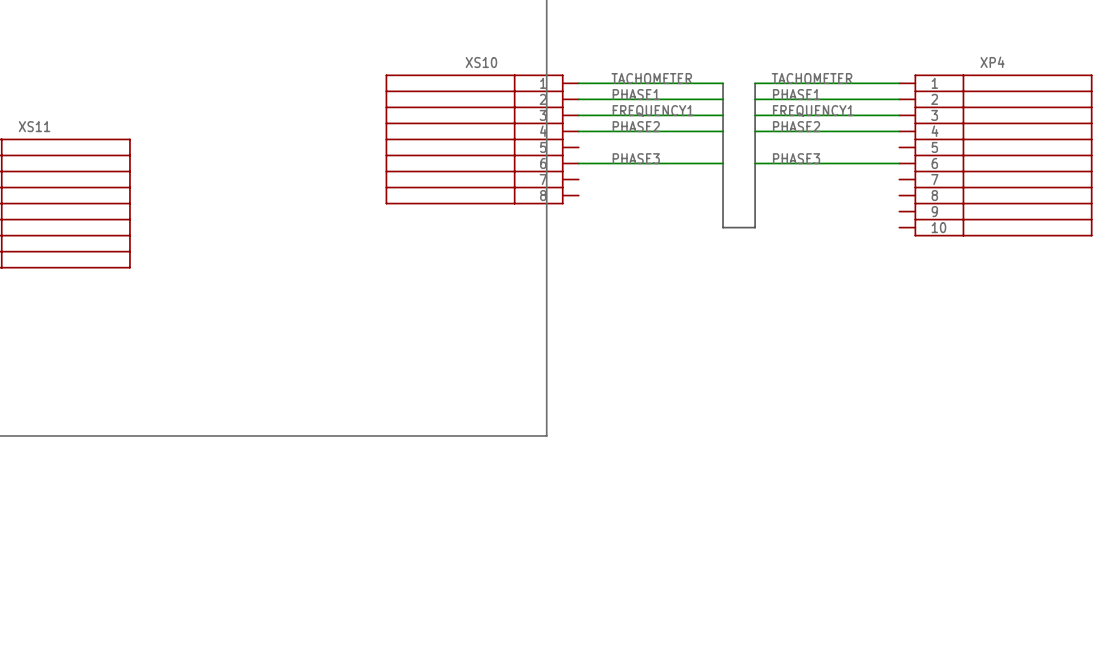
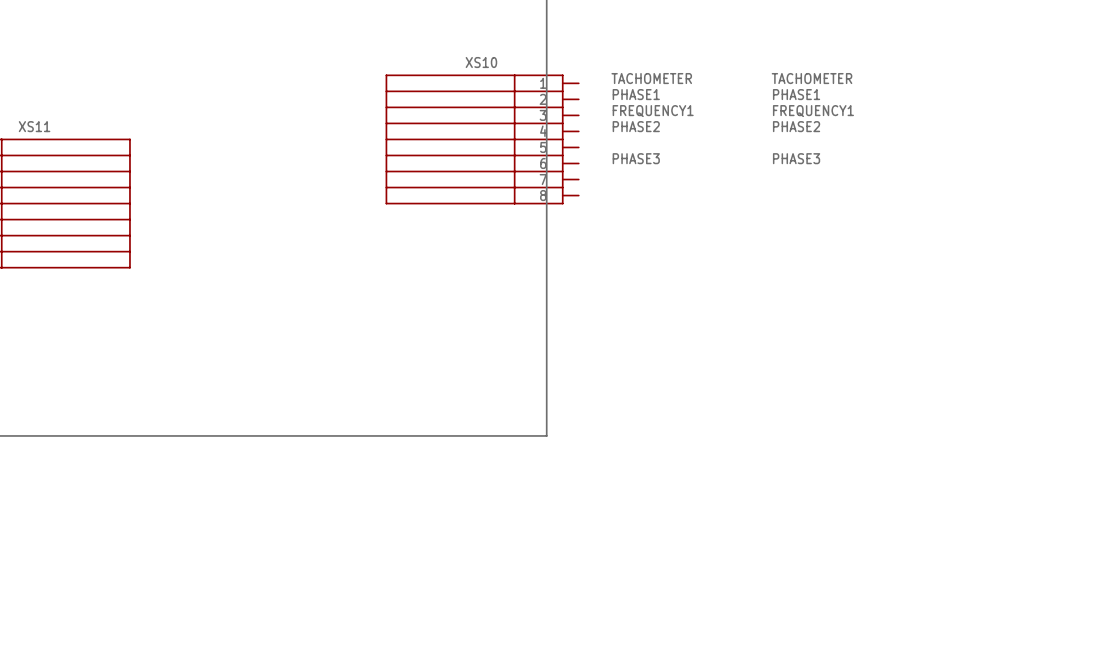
wire: (578, 83) (723, 83) -> none
bus: (723, 83) (723, 227) (755, 227) (755, 83) -> none
wire: (755, 83) (899, 83) -> none
wire: (578, 99) (723, 99) -> none
wire: (755, 99) (899, 99) -> none
wire: (578, 115) (723, 115) -> none
wire: (755, 115) (899, 115) -> none
wire: (578, 131) (723, 131) -> none
wire: (755, 131) (899, 131) -> none
XP4: (995, 155) -> none
wire: (578, 163) (723, 163) -> none
wire: (755, 163) (899, 163) -> none

